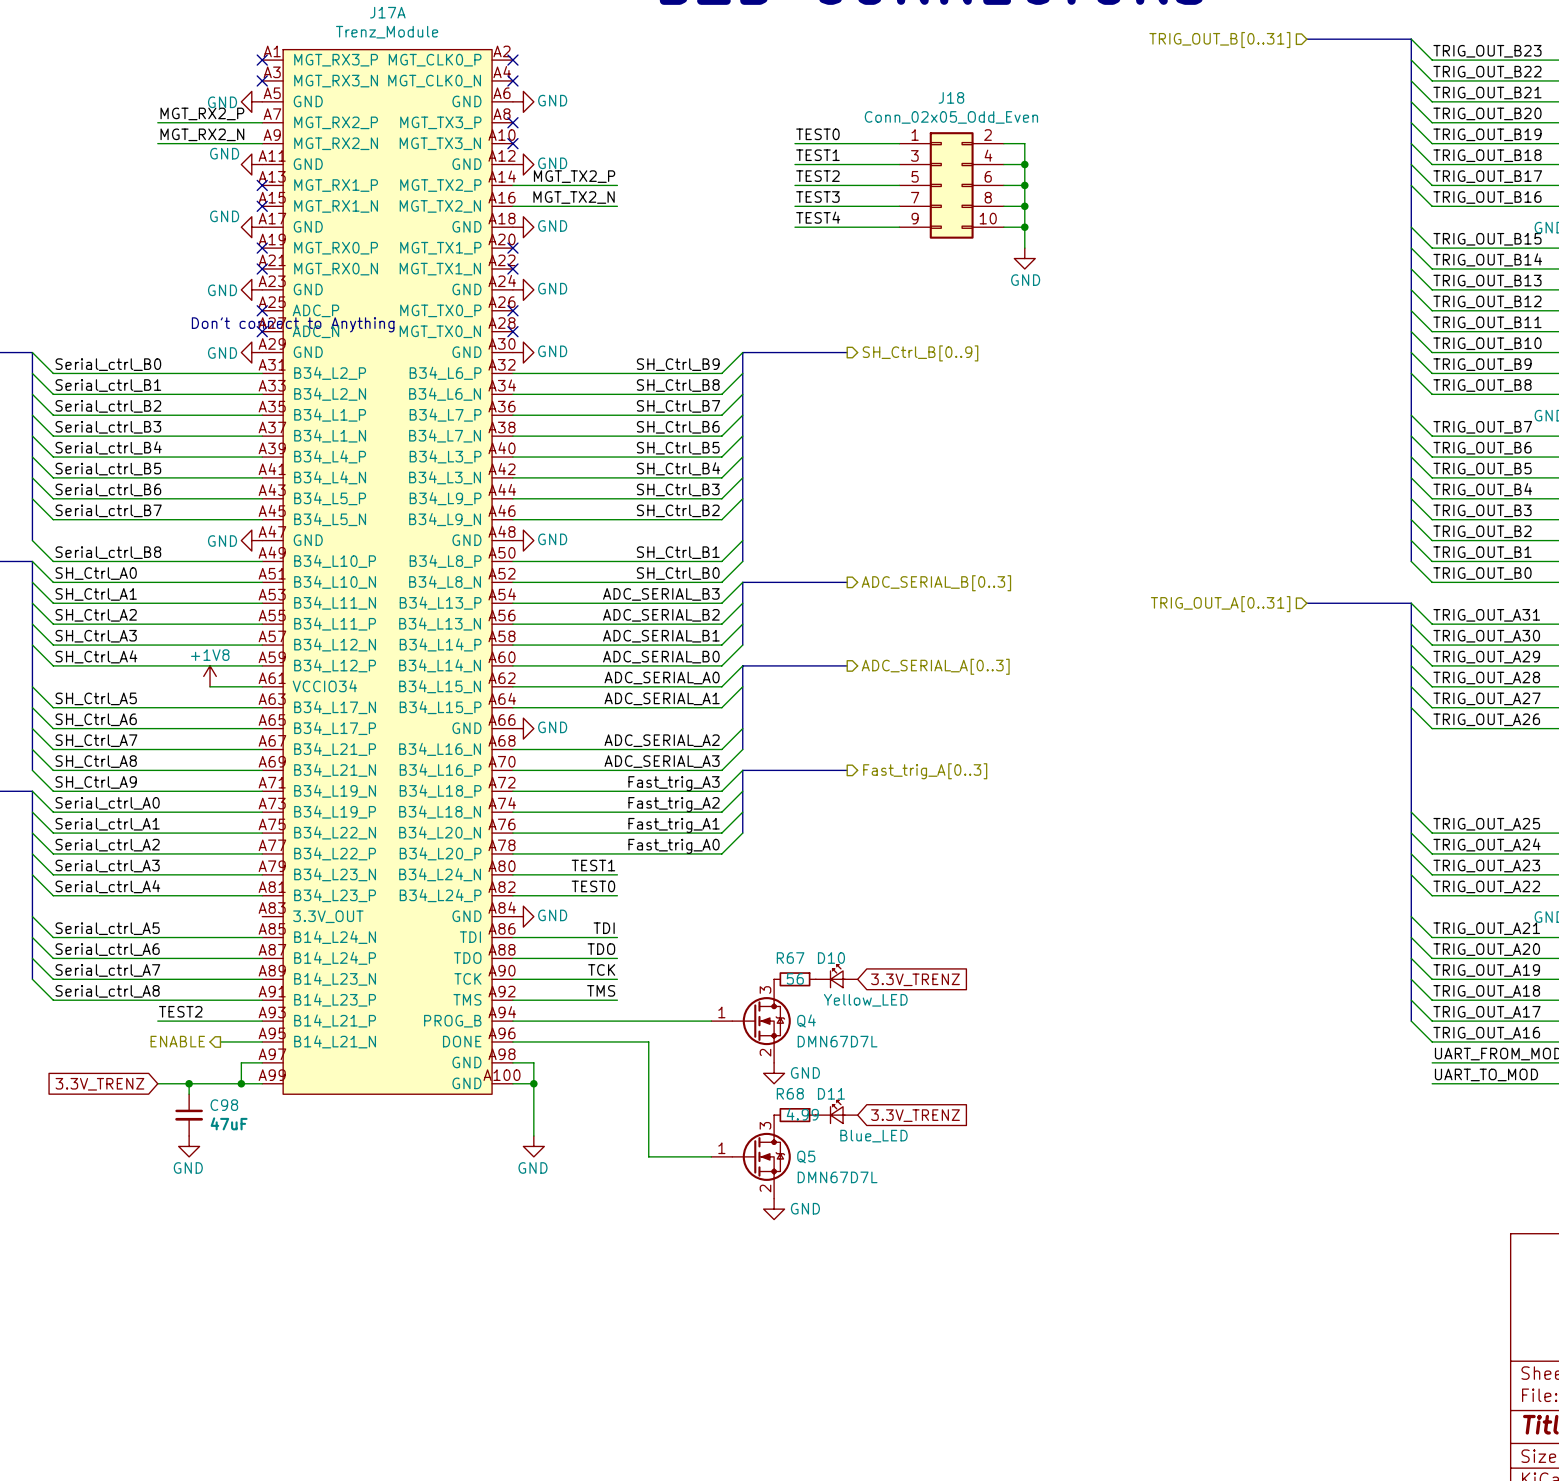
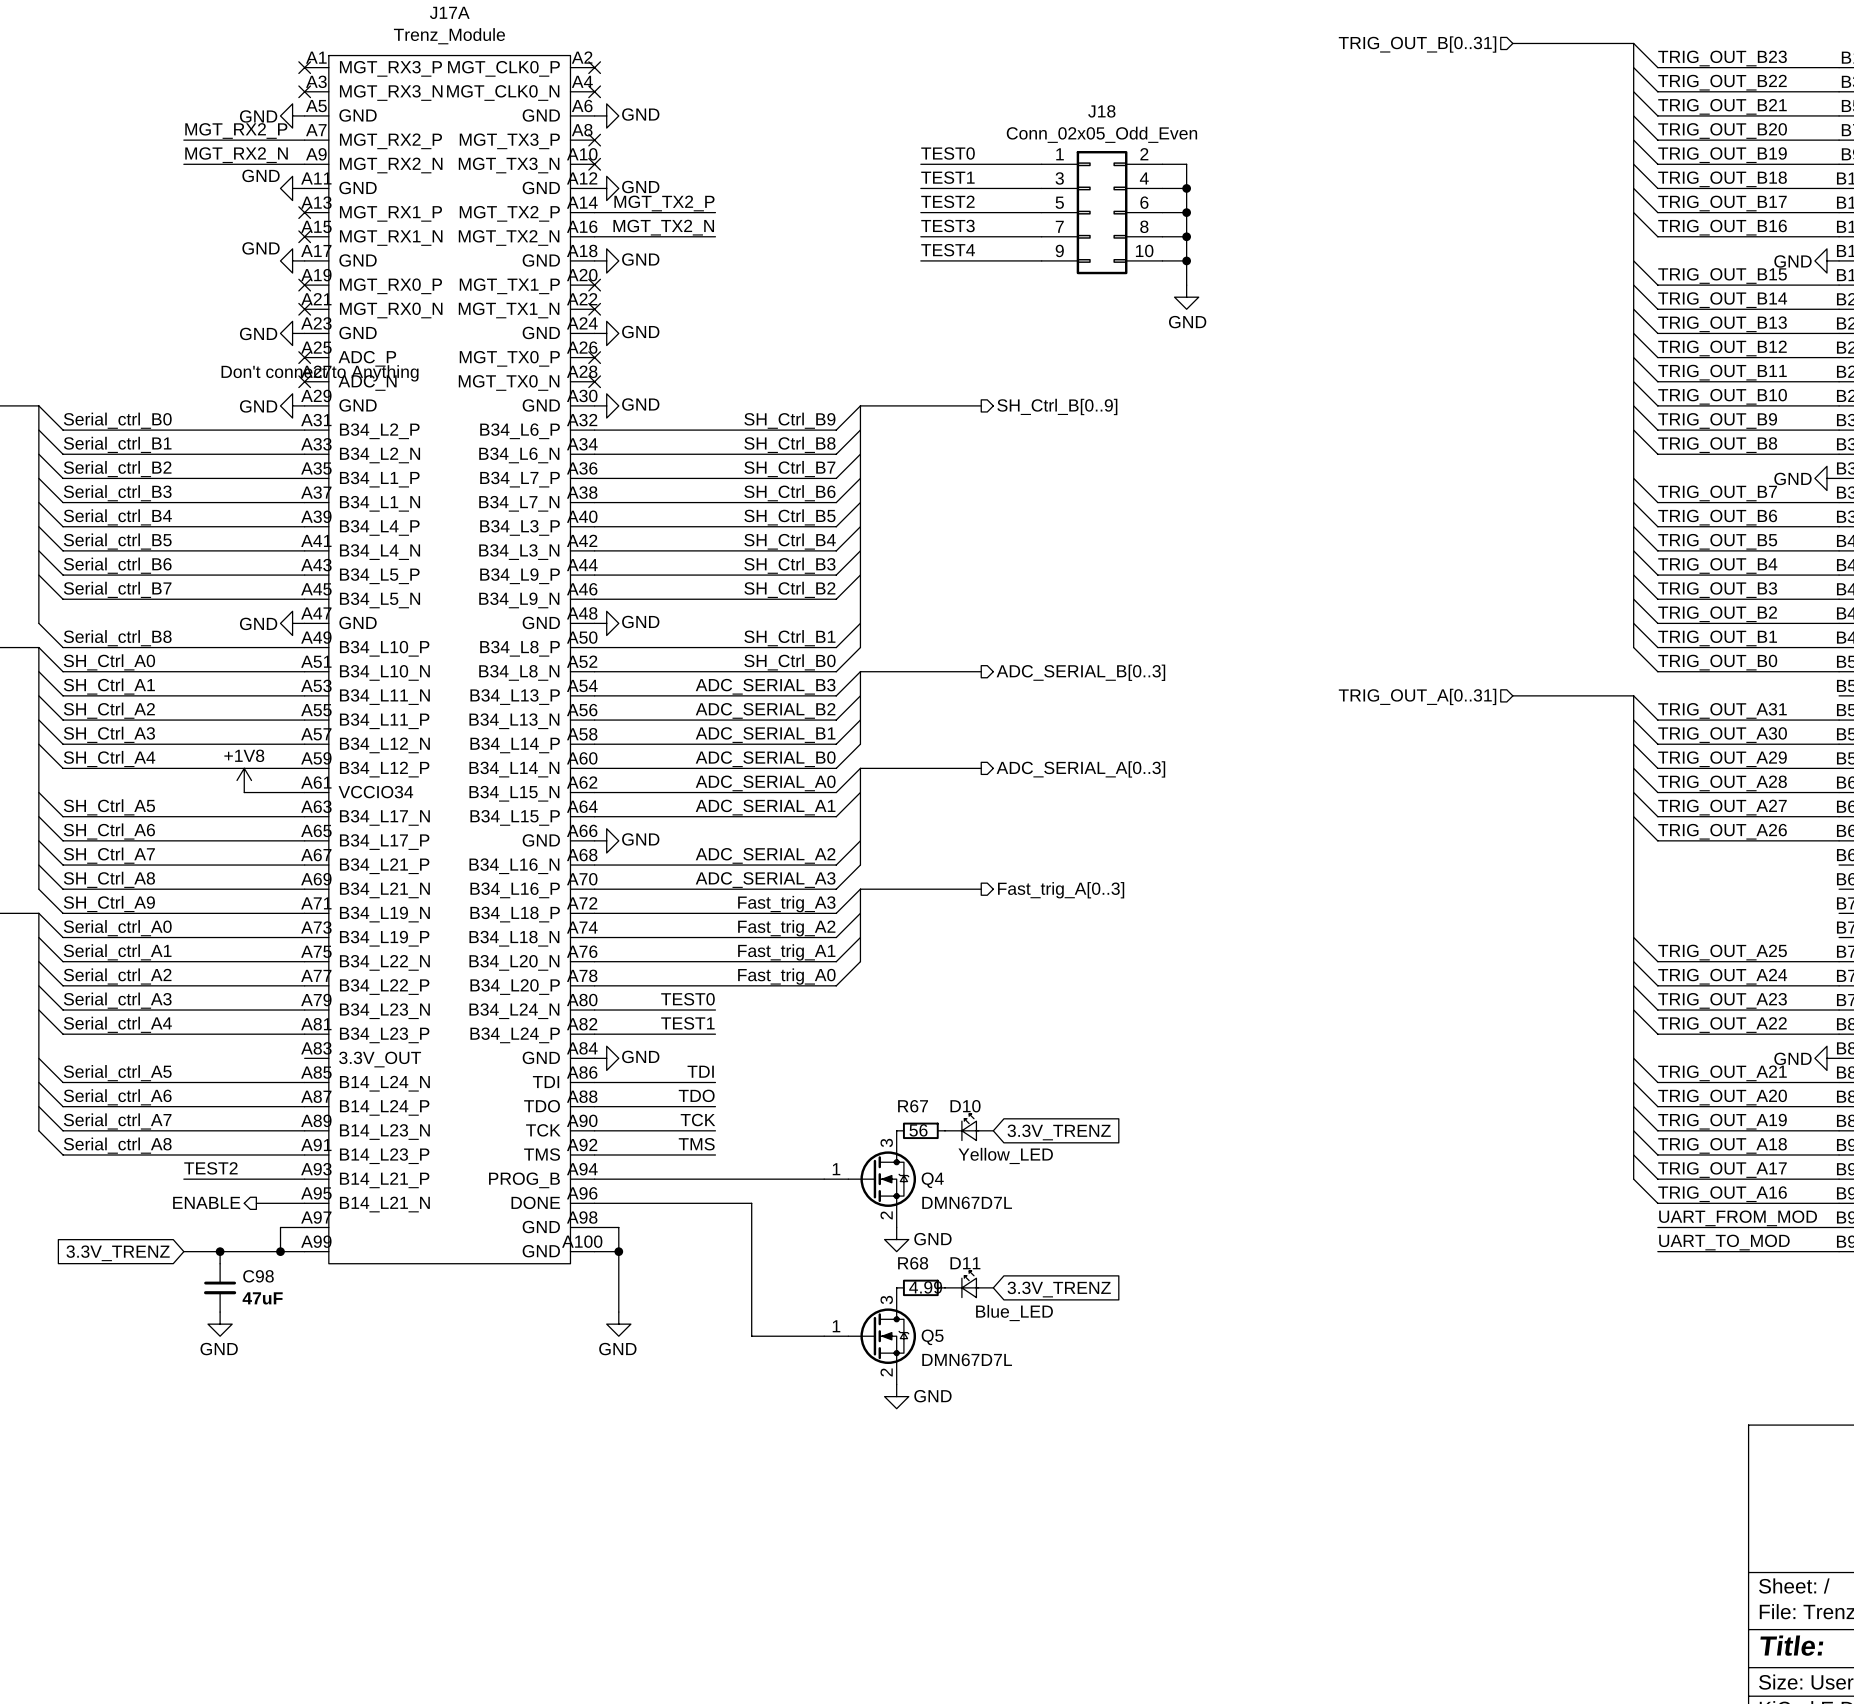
label: TEST1 (593, 865) -> TEST0 (687, 999)
label: TEST0 (593, 886) -> TEST1 (687, 1023)

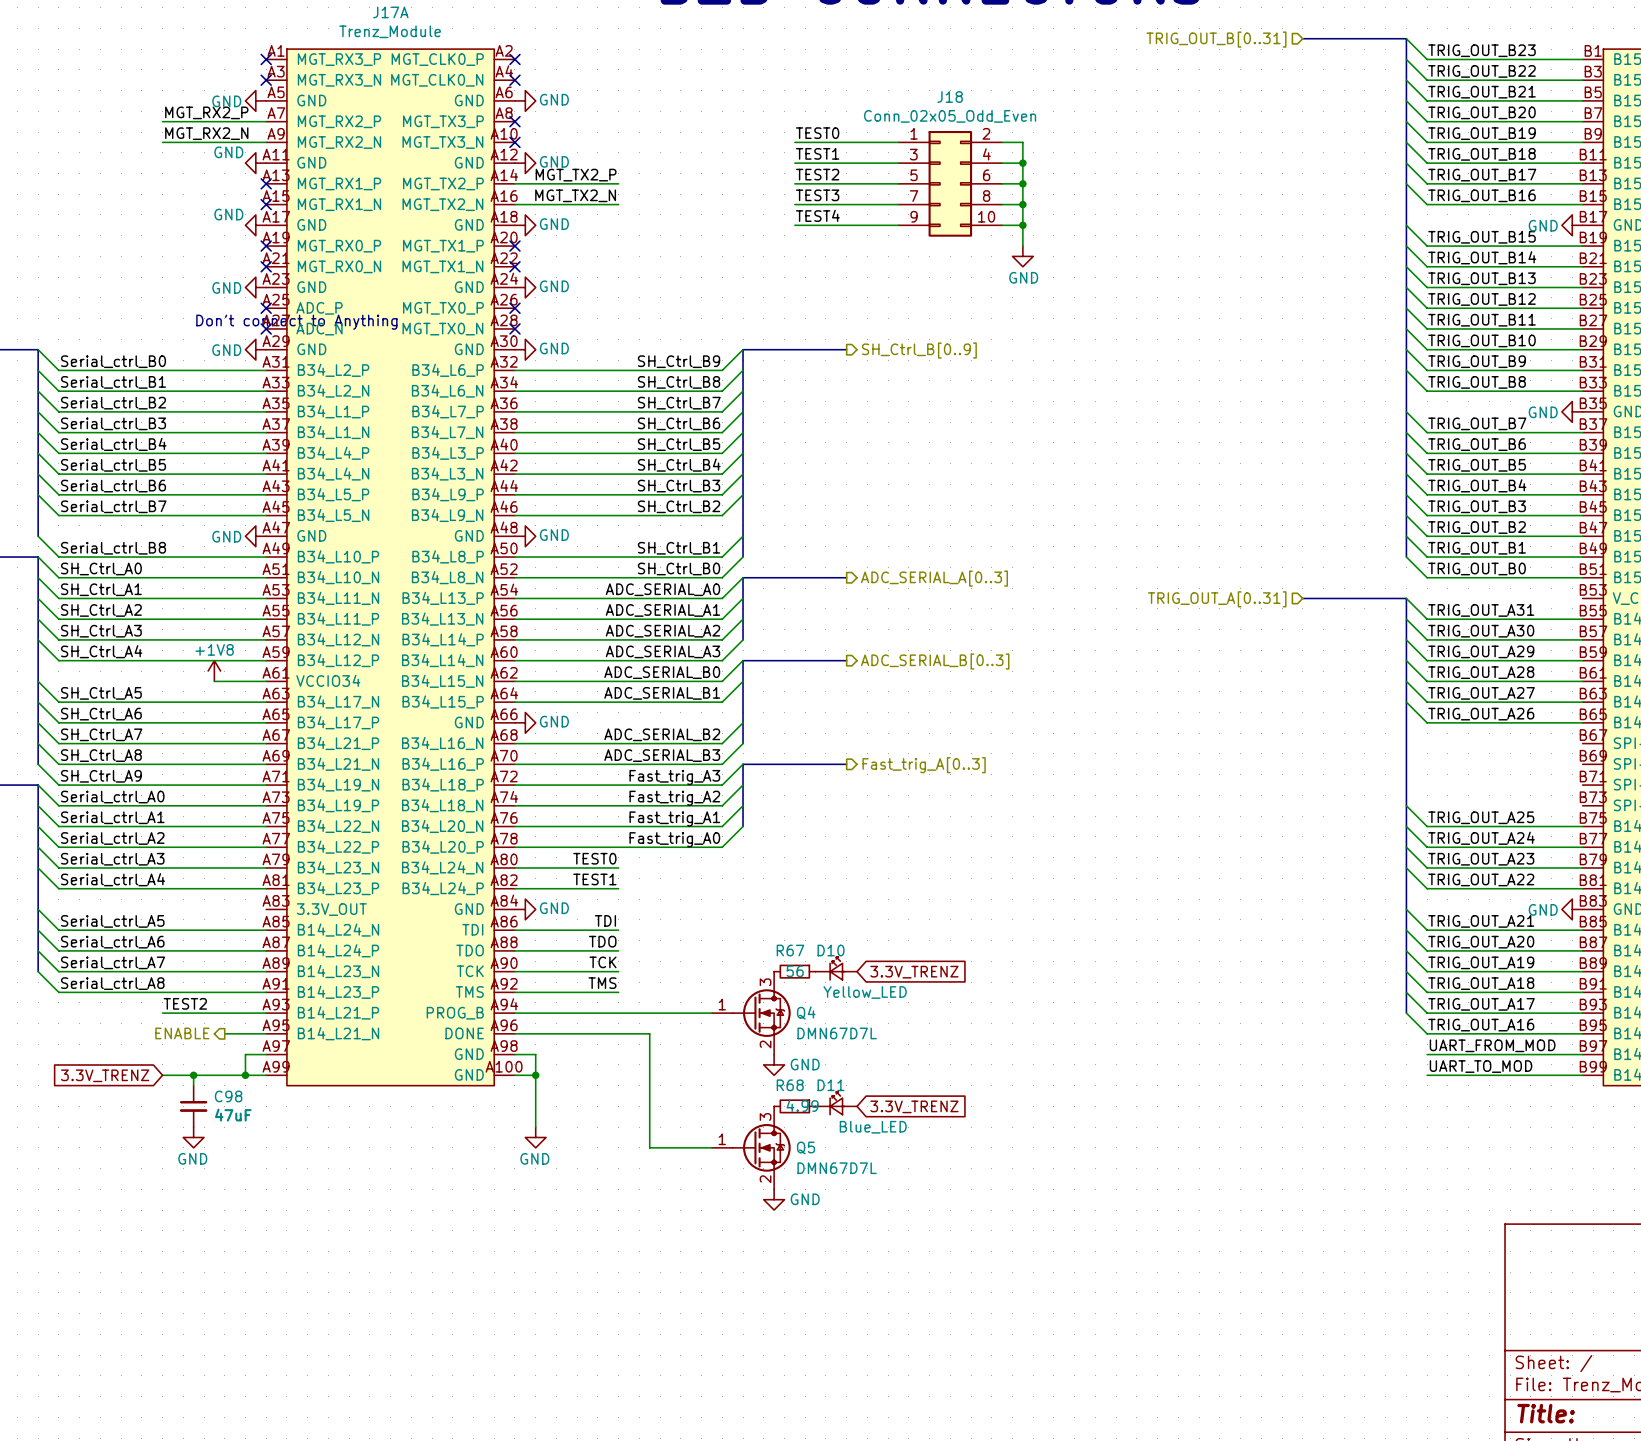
hierarchical label: ADC_SERIAL_B[0..3] (1080, 672) -> ADC_SERIAL_A[0..3] (934, 578)
label: ADC_SERIAL_B3 (765, 686) -> ADC_SERIAL_A0 (662, 589)
label: ADC_SERIAL_B2 (765, 710) -> ADC_SERIAL_A1 (662, 610)
label: ADC_SERIAL_B1 (765, 735) -> ADC_SERIAL_A2 (662, 631)
label: ADC_SERIAL_B0 (765, 759) -> ADC_SERIAL_A3 (662, 651)
hierarchical label: ADC_SERIAL_A[0..3] (1080, 769) -> ADC_SERIAL_B[0..3] (935, 661)
label: ADC_SERIAL_A0 (765, 783) -> ADC_SERIAL_B0 (662, 672)
label: ADC_SERIAL_A1 (765, 807) -> ADC_SERIAL_B1 (662, 693)
label: ADC_SERIAL_A2 (765, 855) -> ADC_SERIAL_B2 (662, 734)
label: ADC_SERIAL_A3 (765, 880) -> ADC_SERIAL_B3 (662, 755)

